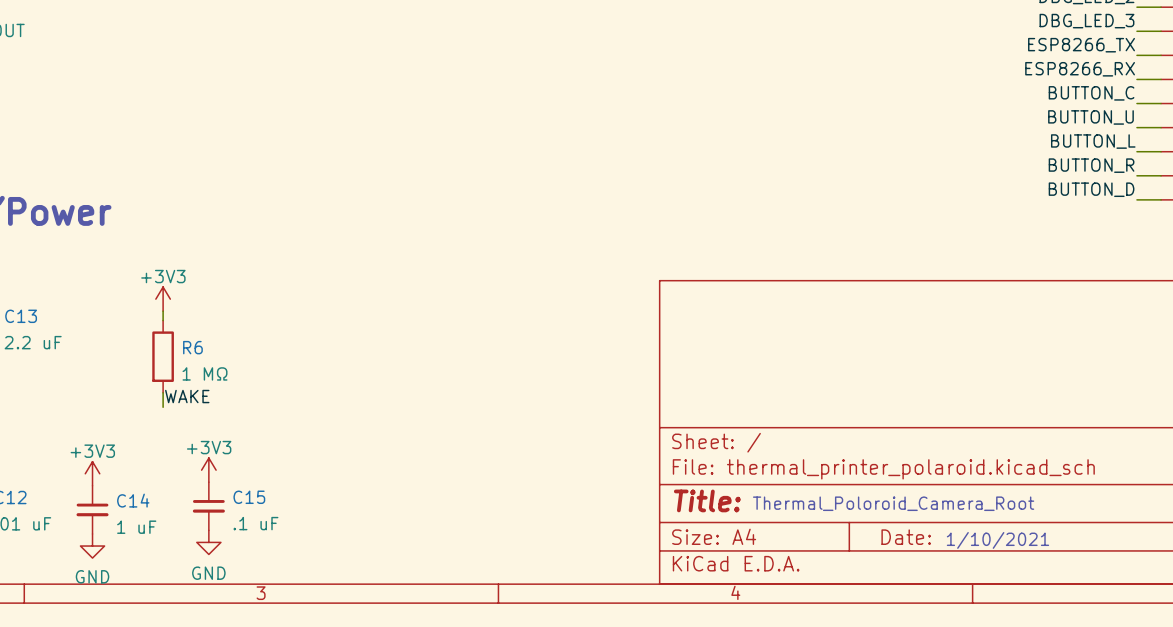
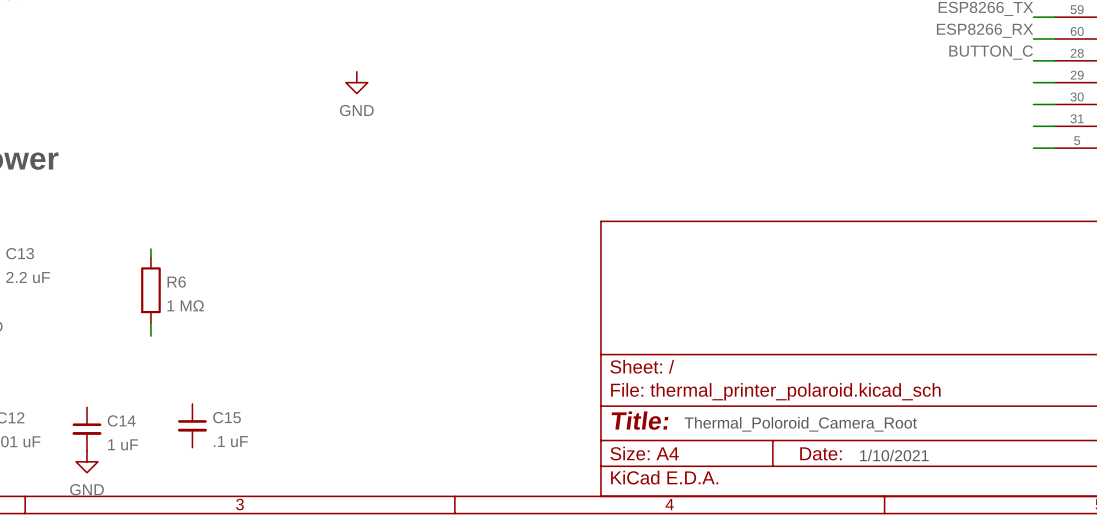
label: BUTTON_U (1090, 117) -> none
power symbol: none -> GND (356, 82)
label: BUTTON_L (1093, 141) -> none
label: BUTTON_R (1091, 165) -> none
label: BUTTON_D (1091, 189) -> none
power symbol: +3V3 (163, 299) -> none
label: WAKE (187, 396) -> none
power symbol: +3V3 (208, 470) -> none
power symbol: +3V3 (92, 473) -> none
power symbol: GND (208, 542) -> none

